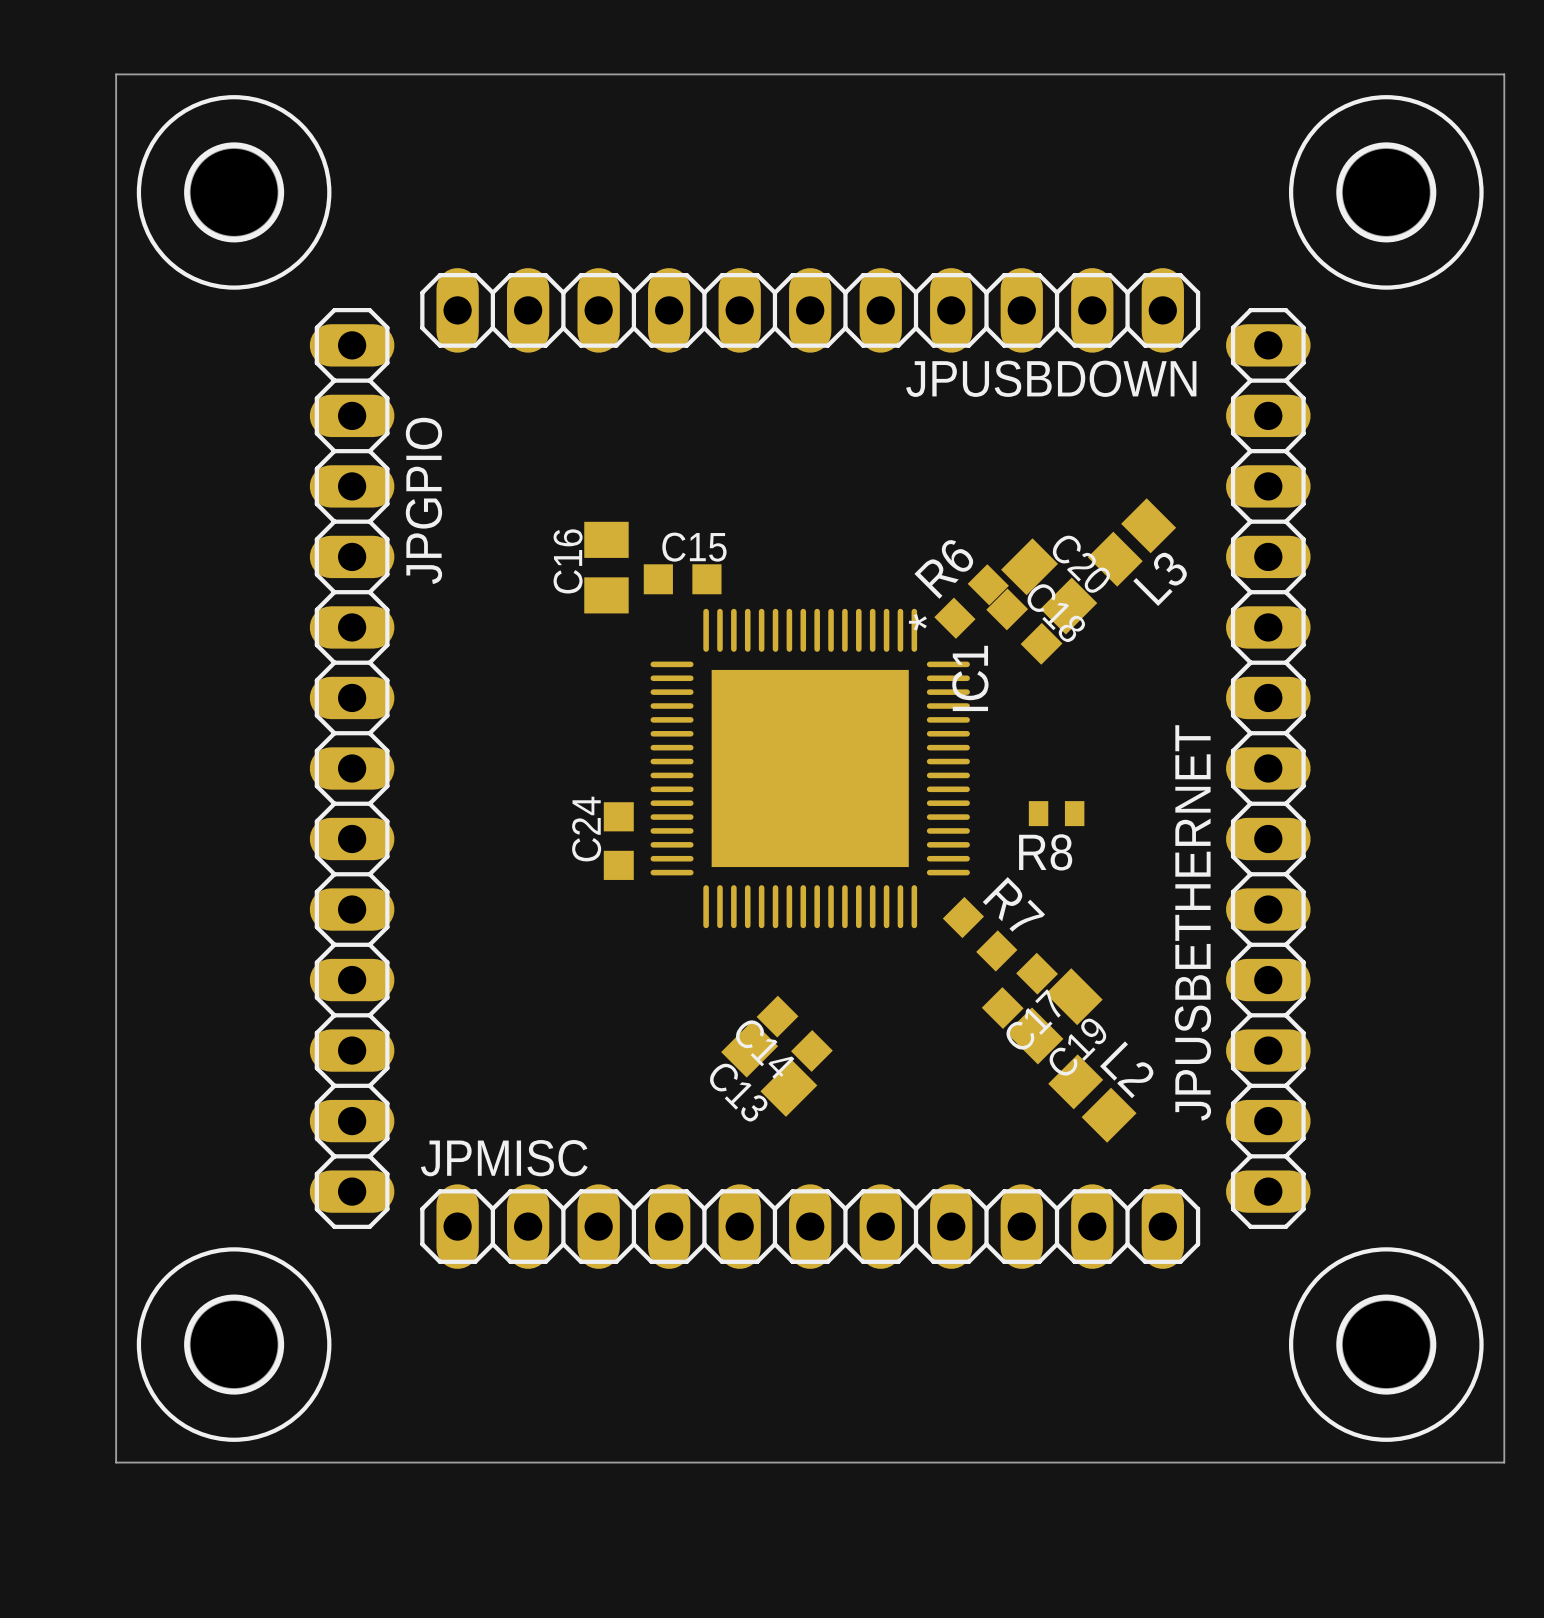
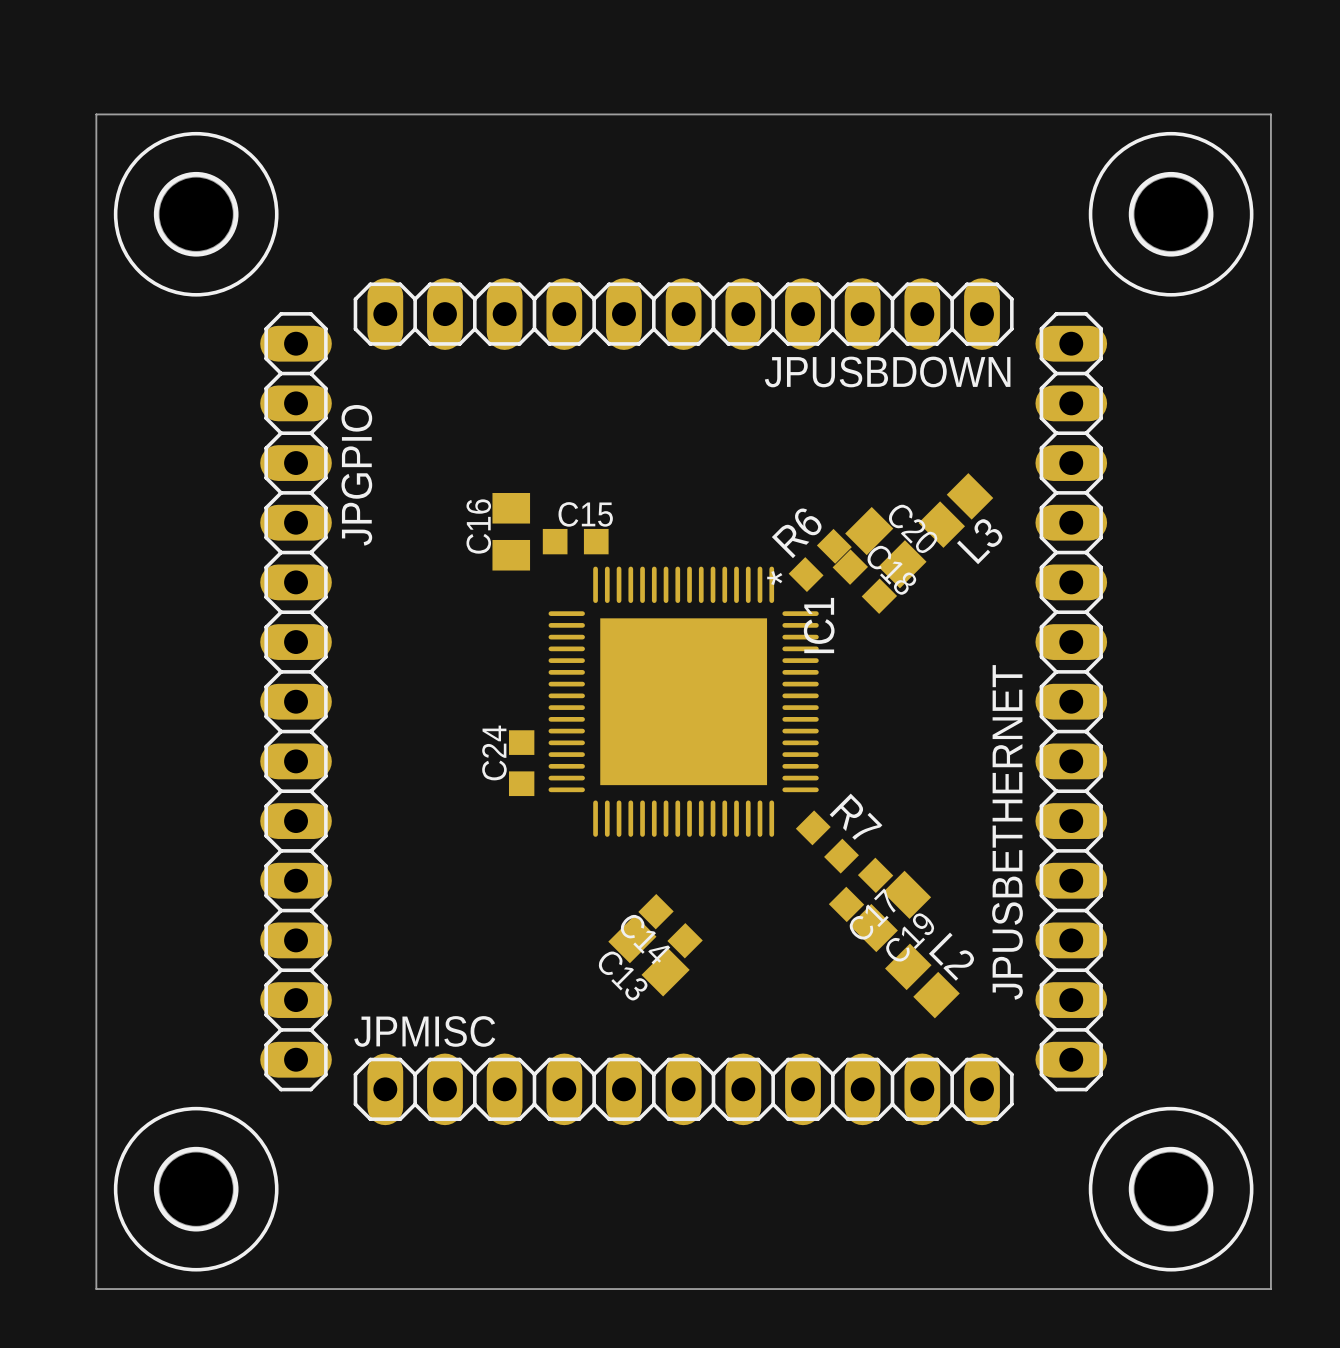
R8: (1056, 813) -> none

